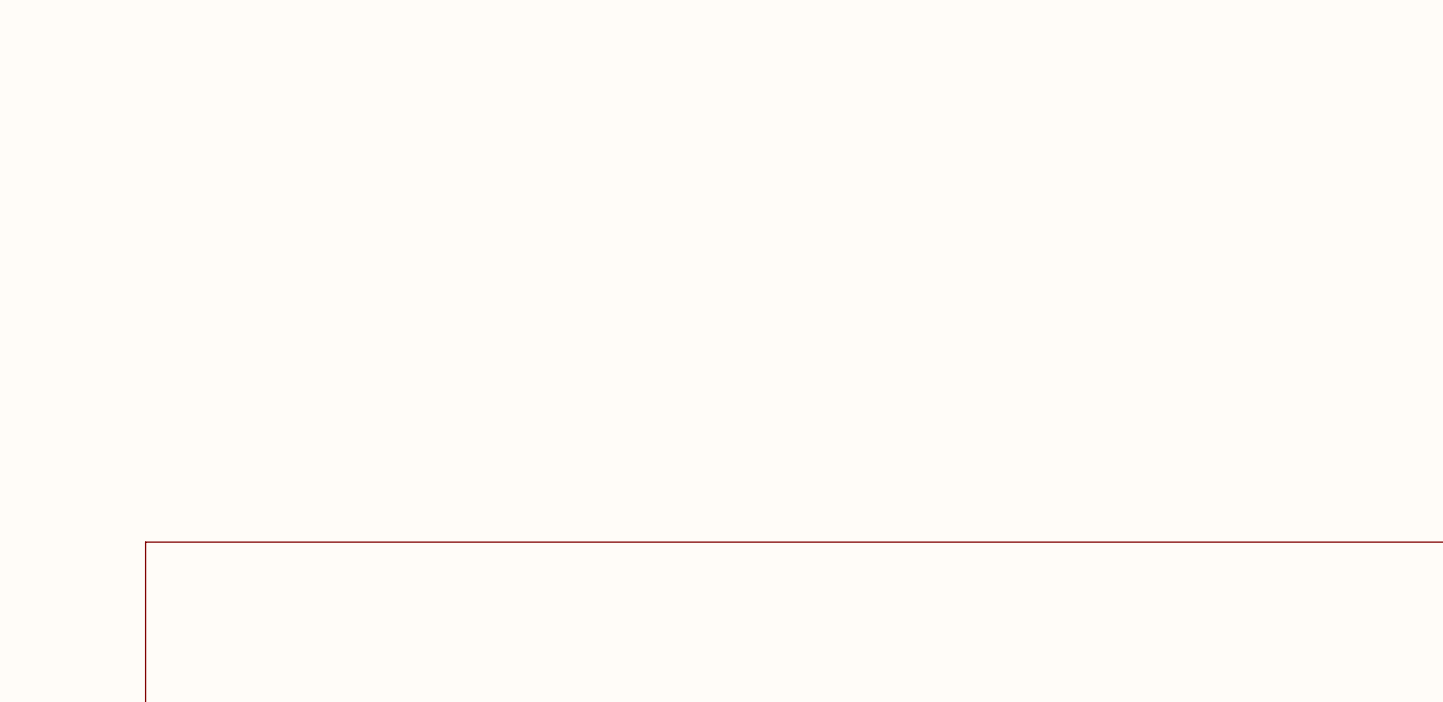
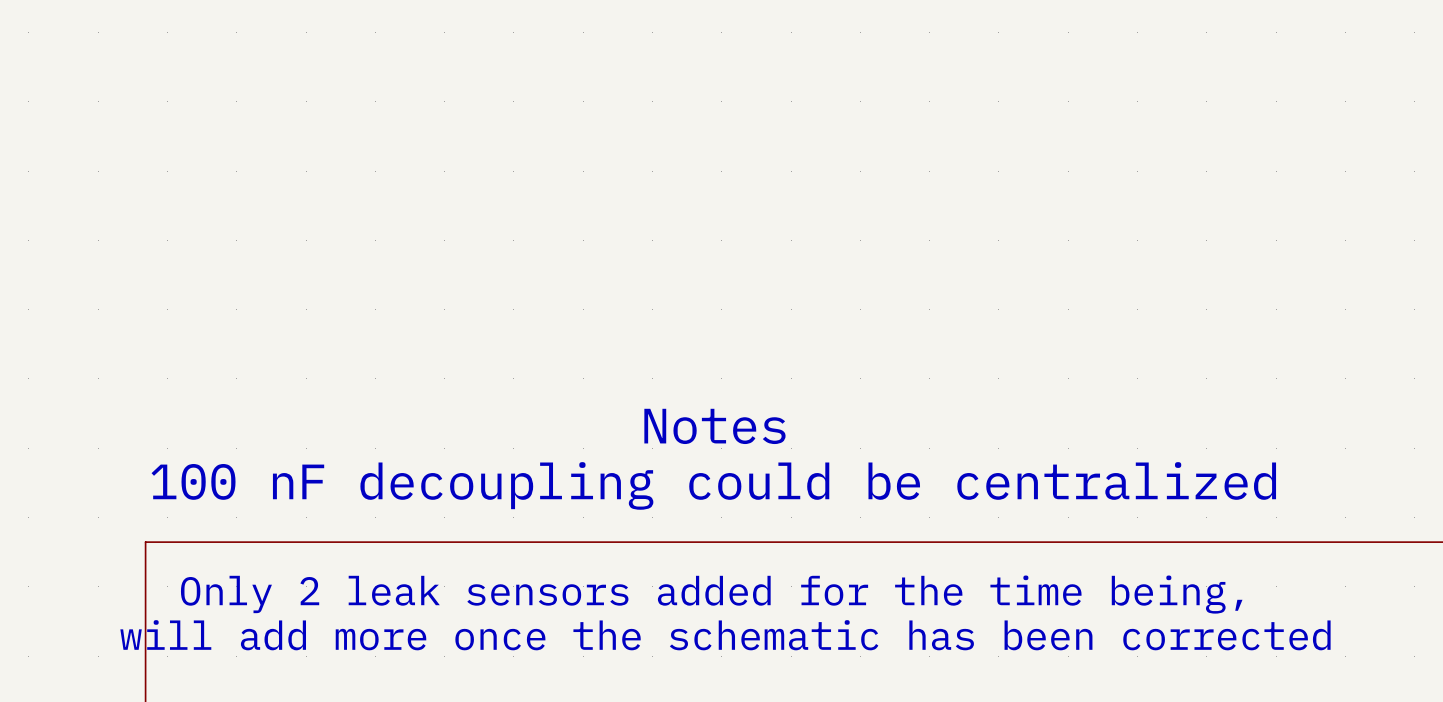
text: none -> Notes (714, 426)
text: none -> 100 nF decoupling could be centralized (713, 485)
text: none -> Only 2 leak sensors added for the time being, (711, 594)
text: none -> will add more once the schematic has been corrected (725, 635)

